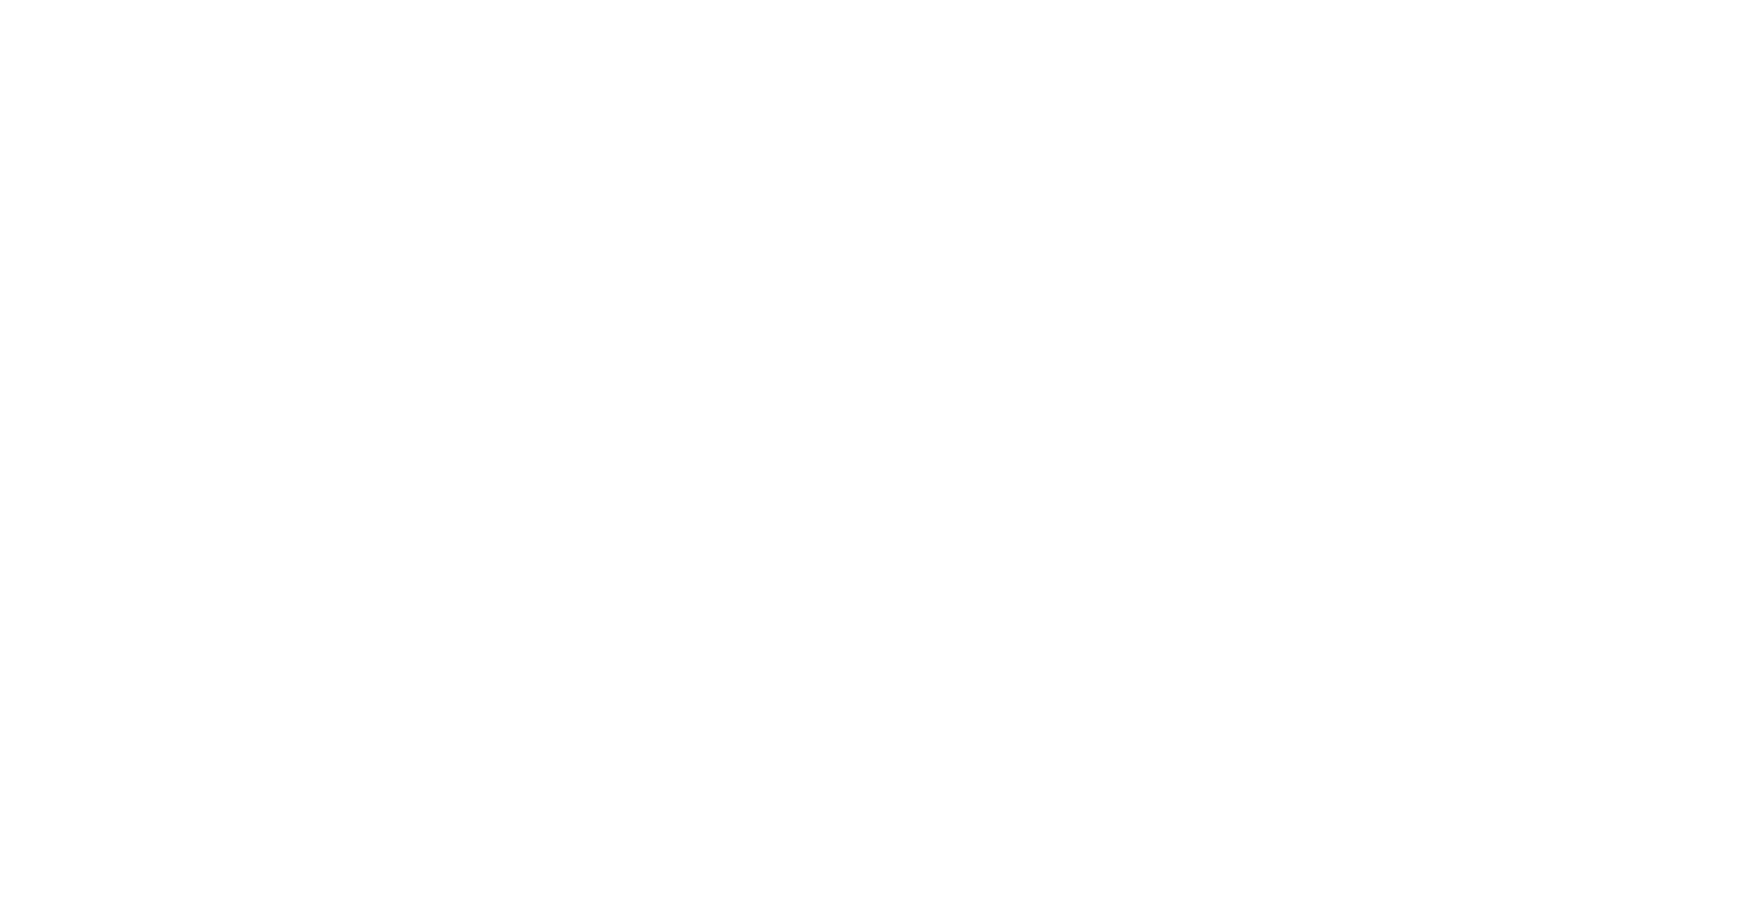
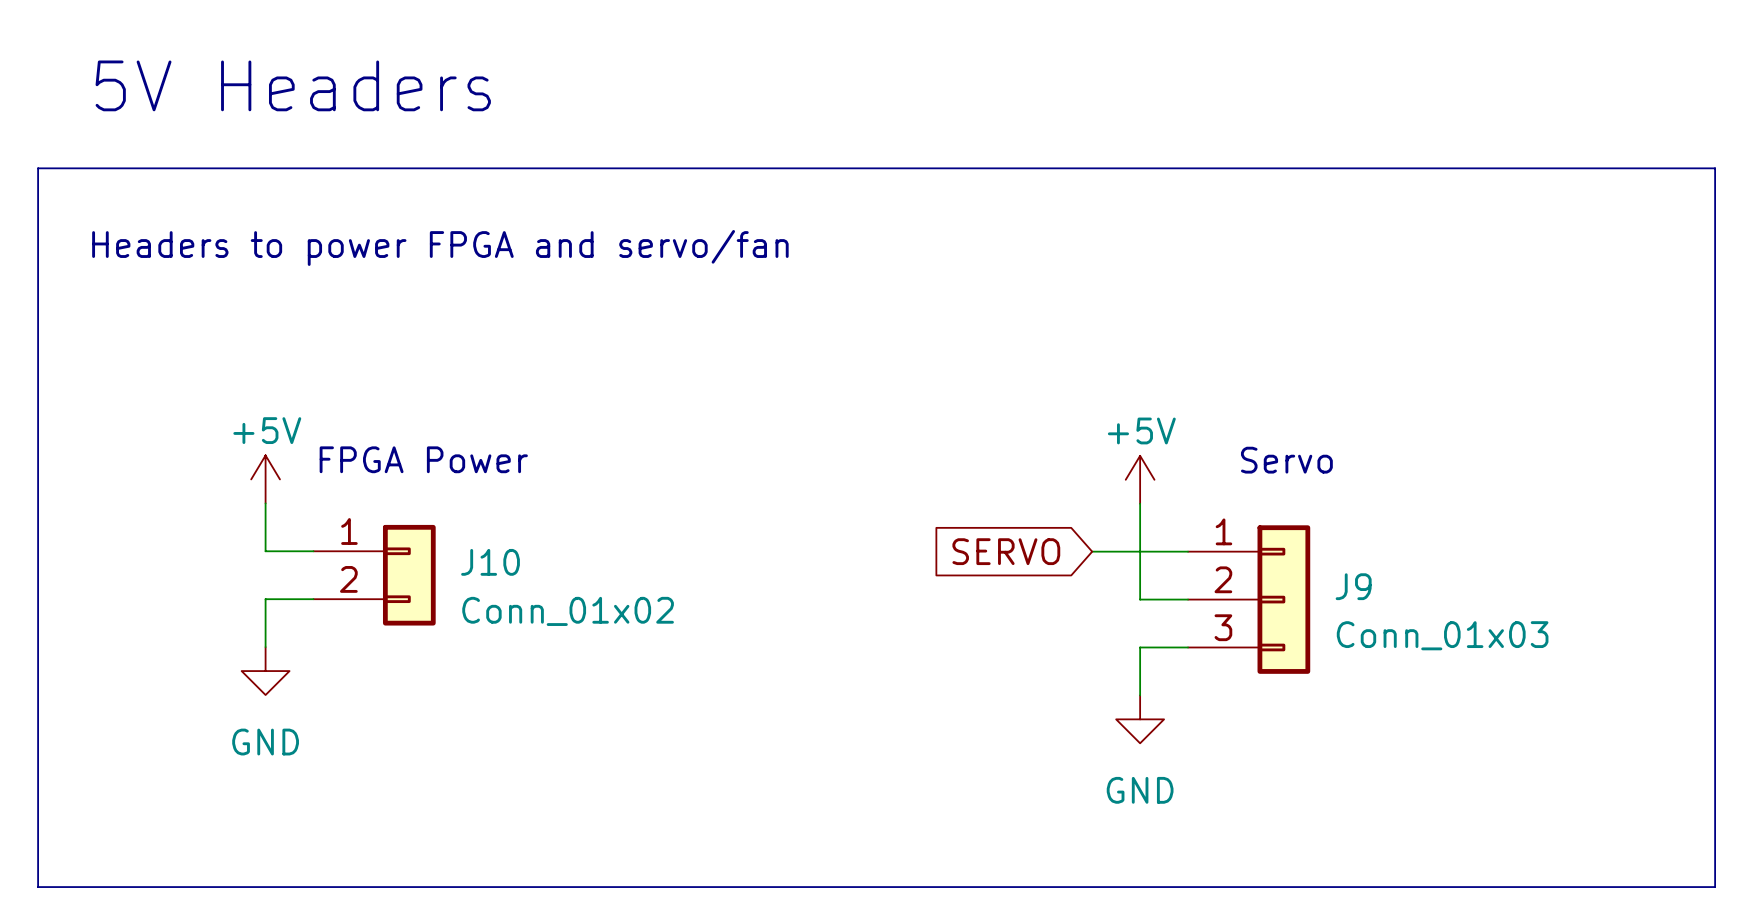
text: none -> 5V Headers (293, 85)
line: none -> (38, 168) (38, 887) (1715, 887) (1715, 168) (38, 168)
text: none -> Headers to power FPGA and servo/fan (440, 247)
text: none -> FPGA Power (423, 459)
text: none -> Servo (1286, 460)
power symbol: none -> +5V (265, 479)
power symbol: none -> +5V (1140, 479)
wire: none -> (265, 503) (265, 551) (313, 551)
wire: none -> (1140, 503) (1140, 599) (1188, 599)
global label: none -> SERVO (1006, 551)
wire: none -> (1092, 551) (1188, 551)
J10: none -> Conn_01x02 (374, 575)
wire: none -> (313, 599) (265, 599) (265, 647)
J9: none -> Conn_01x03 (1249, 599)
wire: none -> (1188, 647) (1140, 647) (1140, 695)
power symbol: none -> GND (265, 671)
power symbol: none -> GND (1140, 719)

